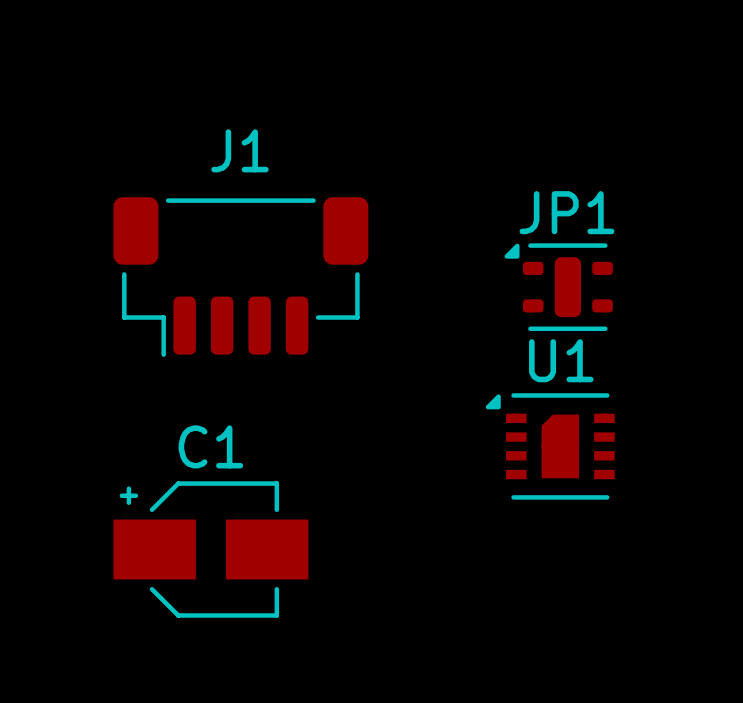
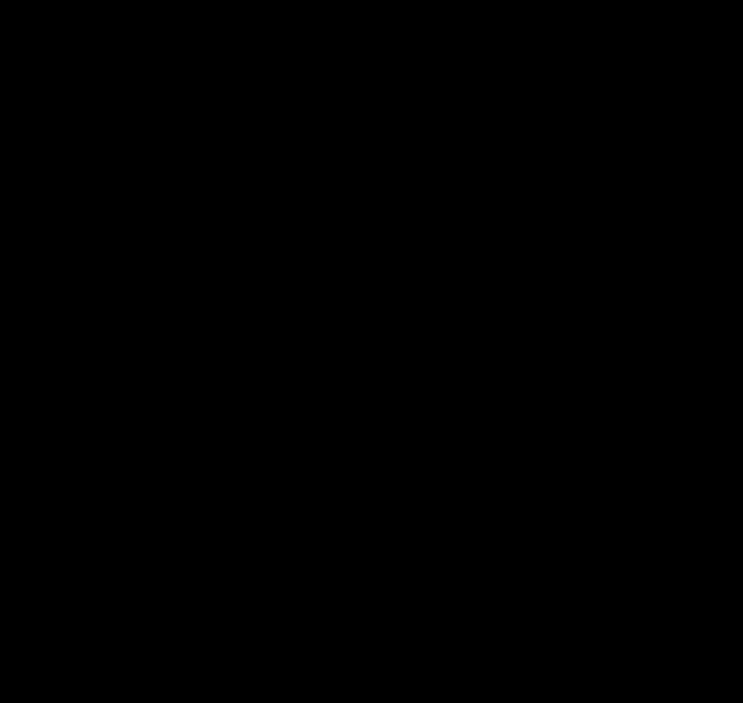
J1: (240, 277) -> none
JP1: (558, 287) -> none
U1: (550, 446) -> none
C1: (210, 549) -> none

